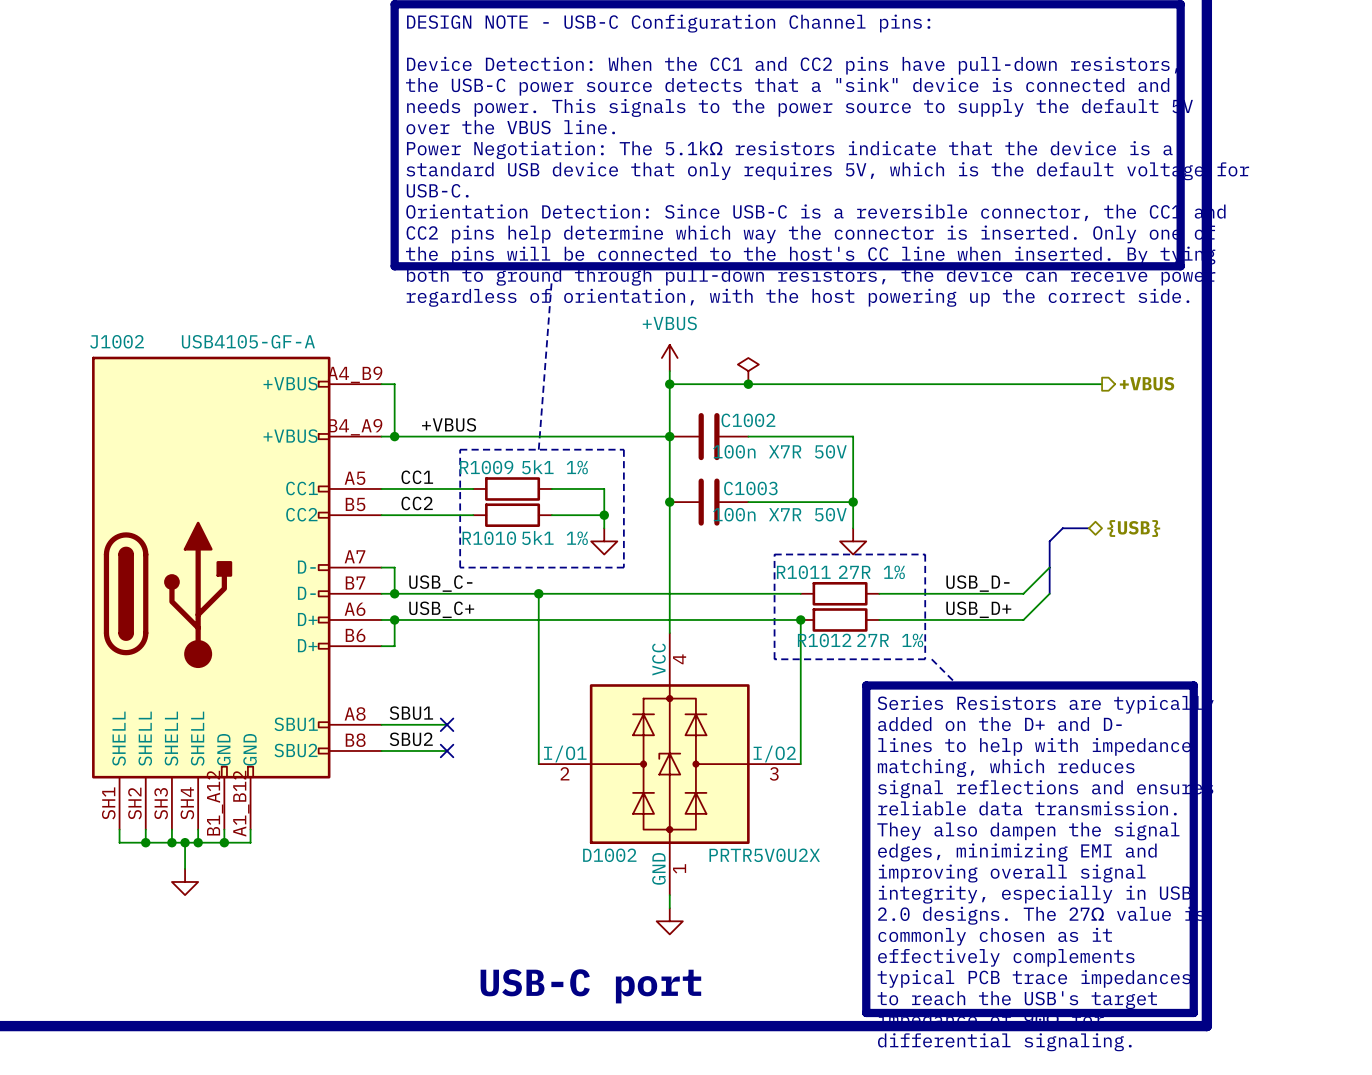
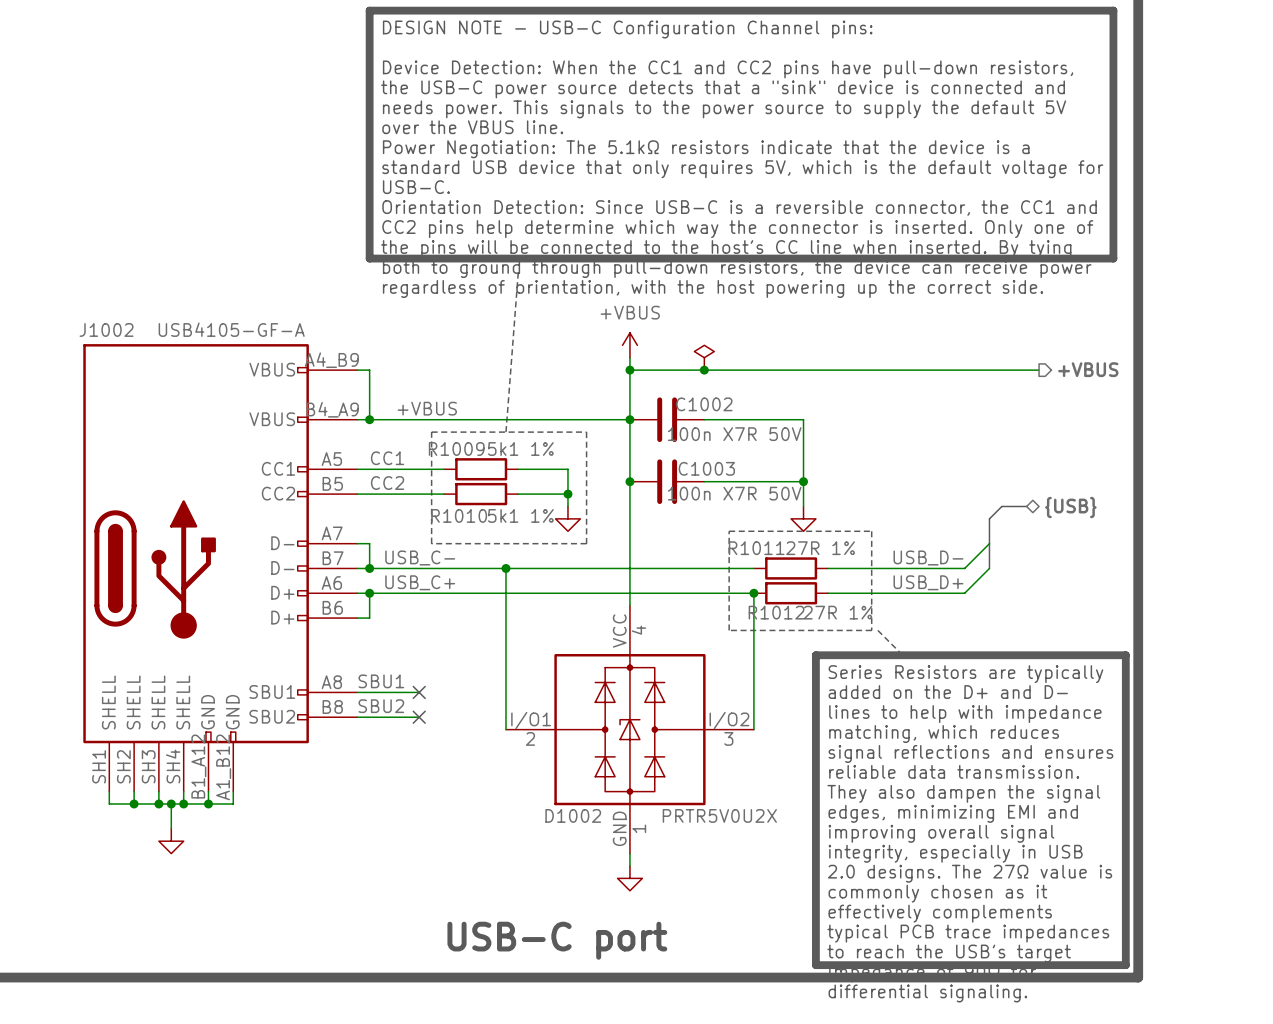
J1002 pin name: +VBUS (290, 383) -> VBUS (272, 369)
J1002 pin name: +VBUS (290, 436) -> VBUS (272, 419)

